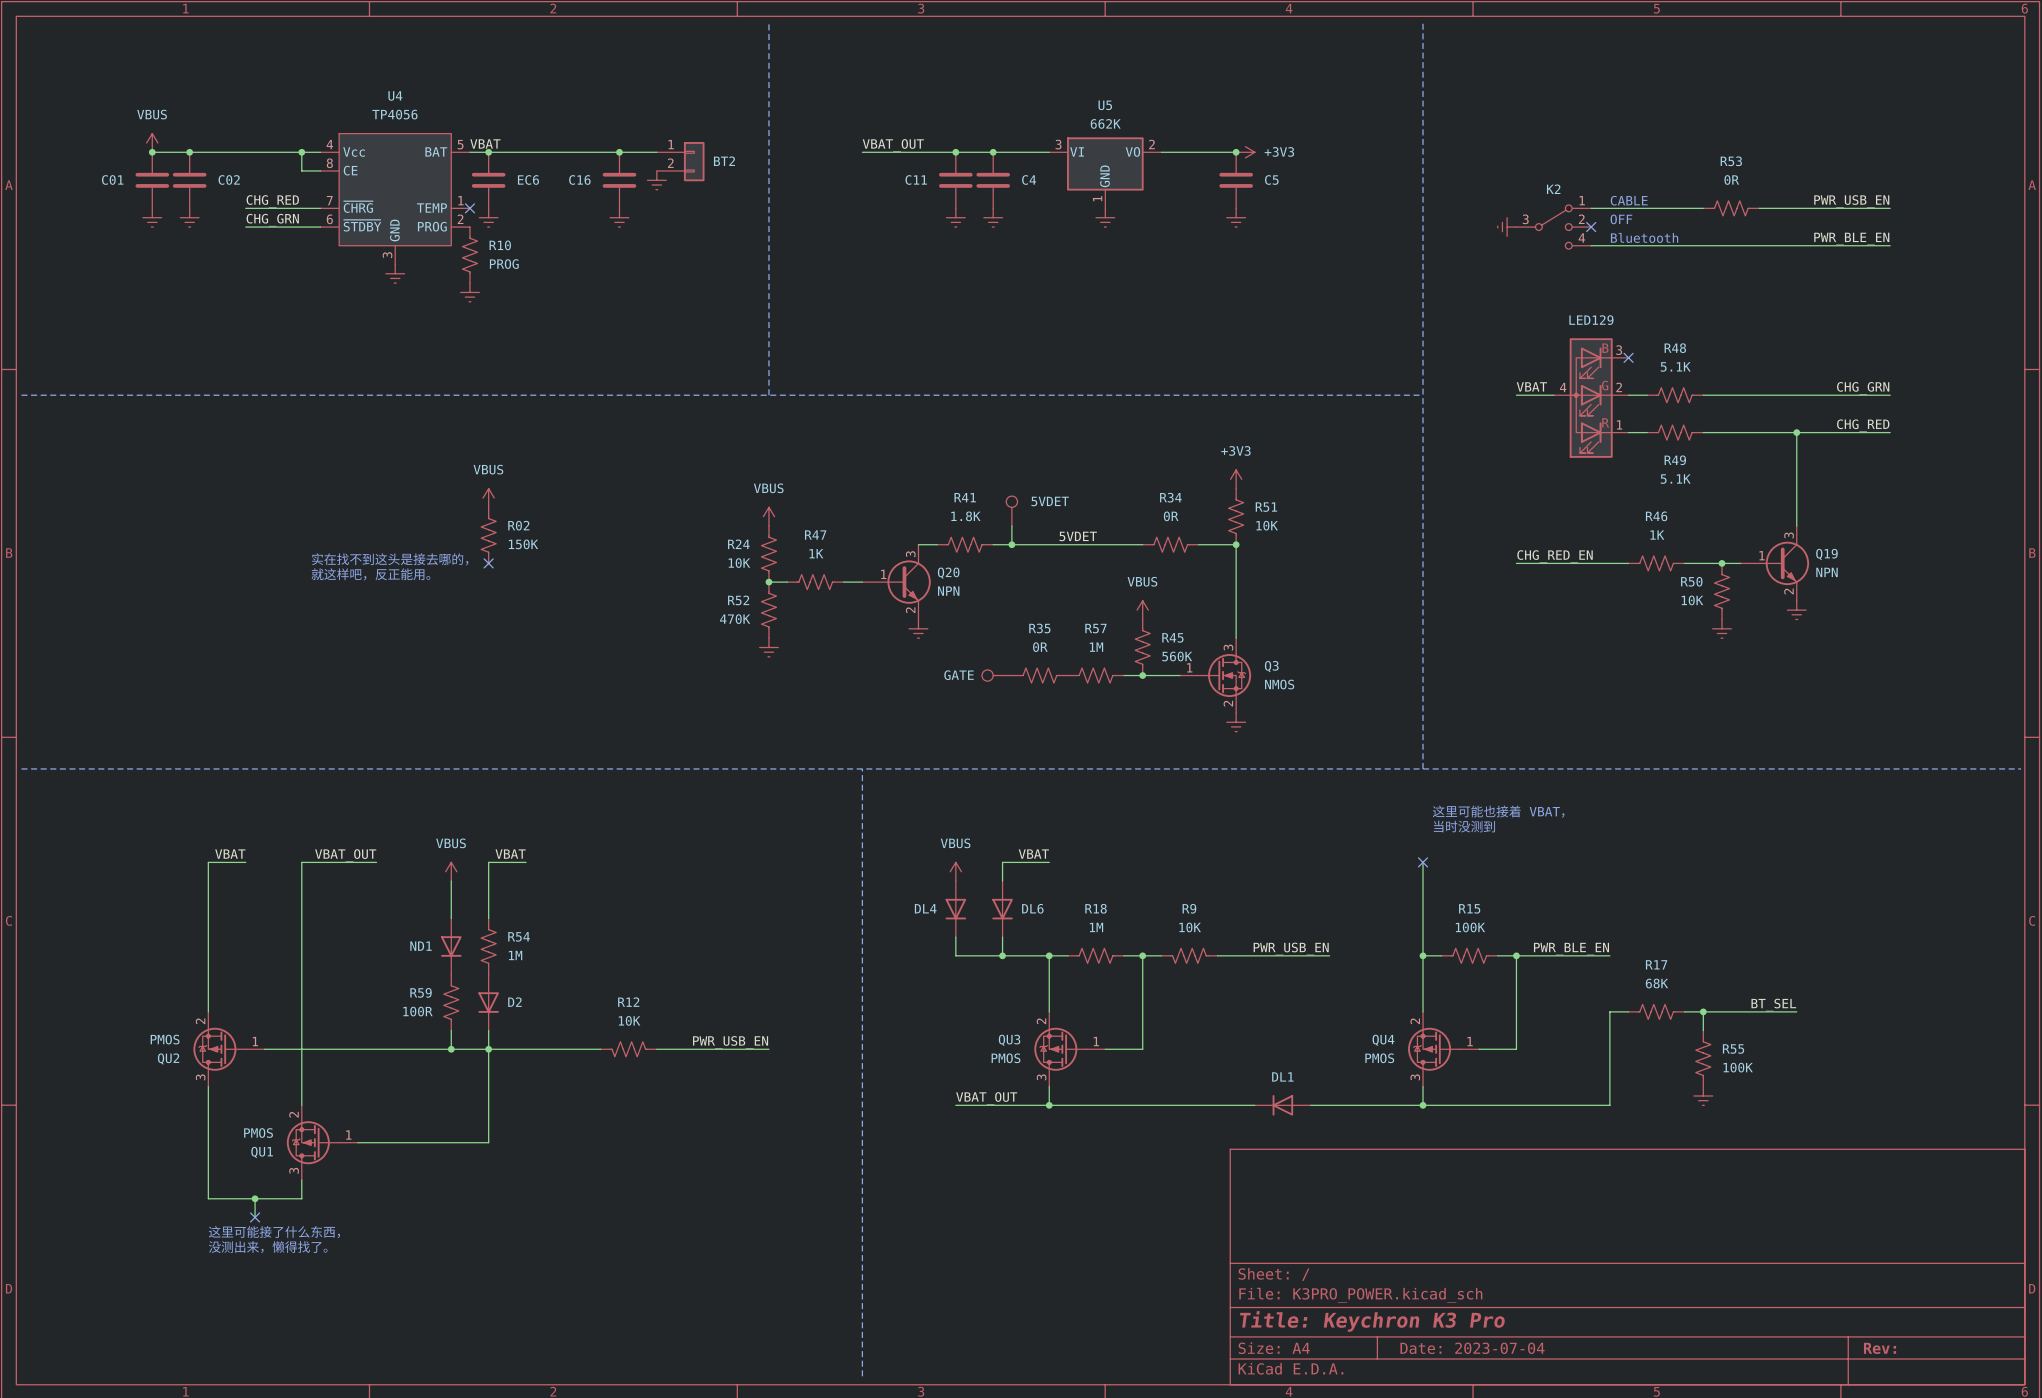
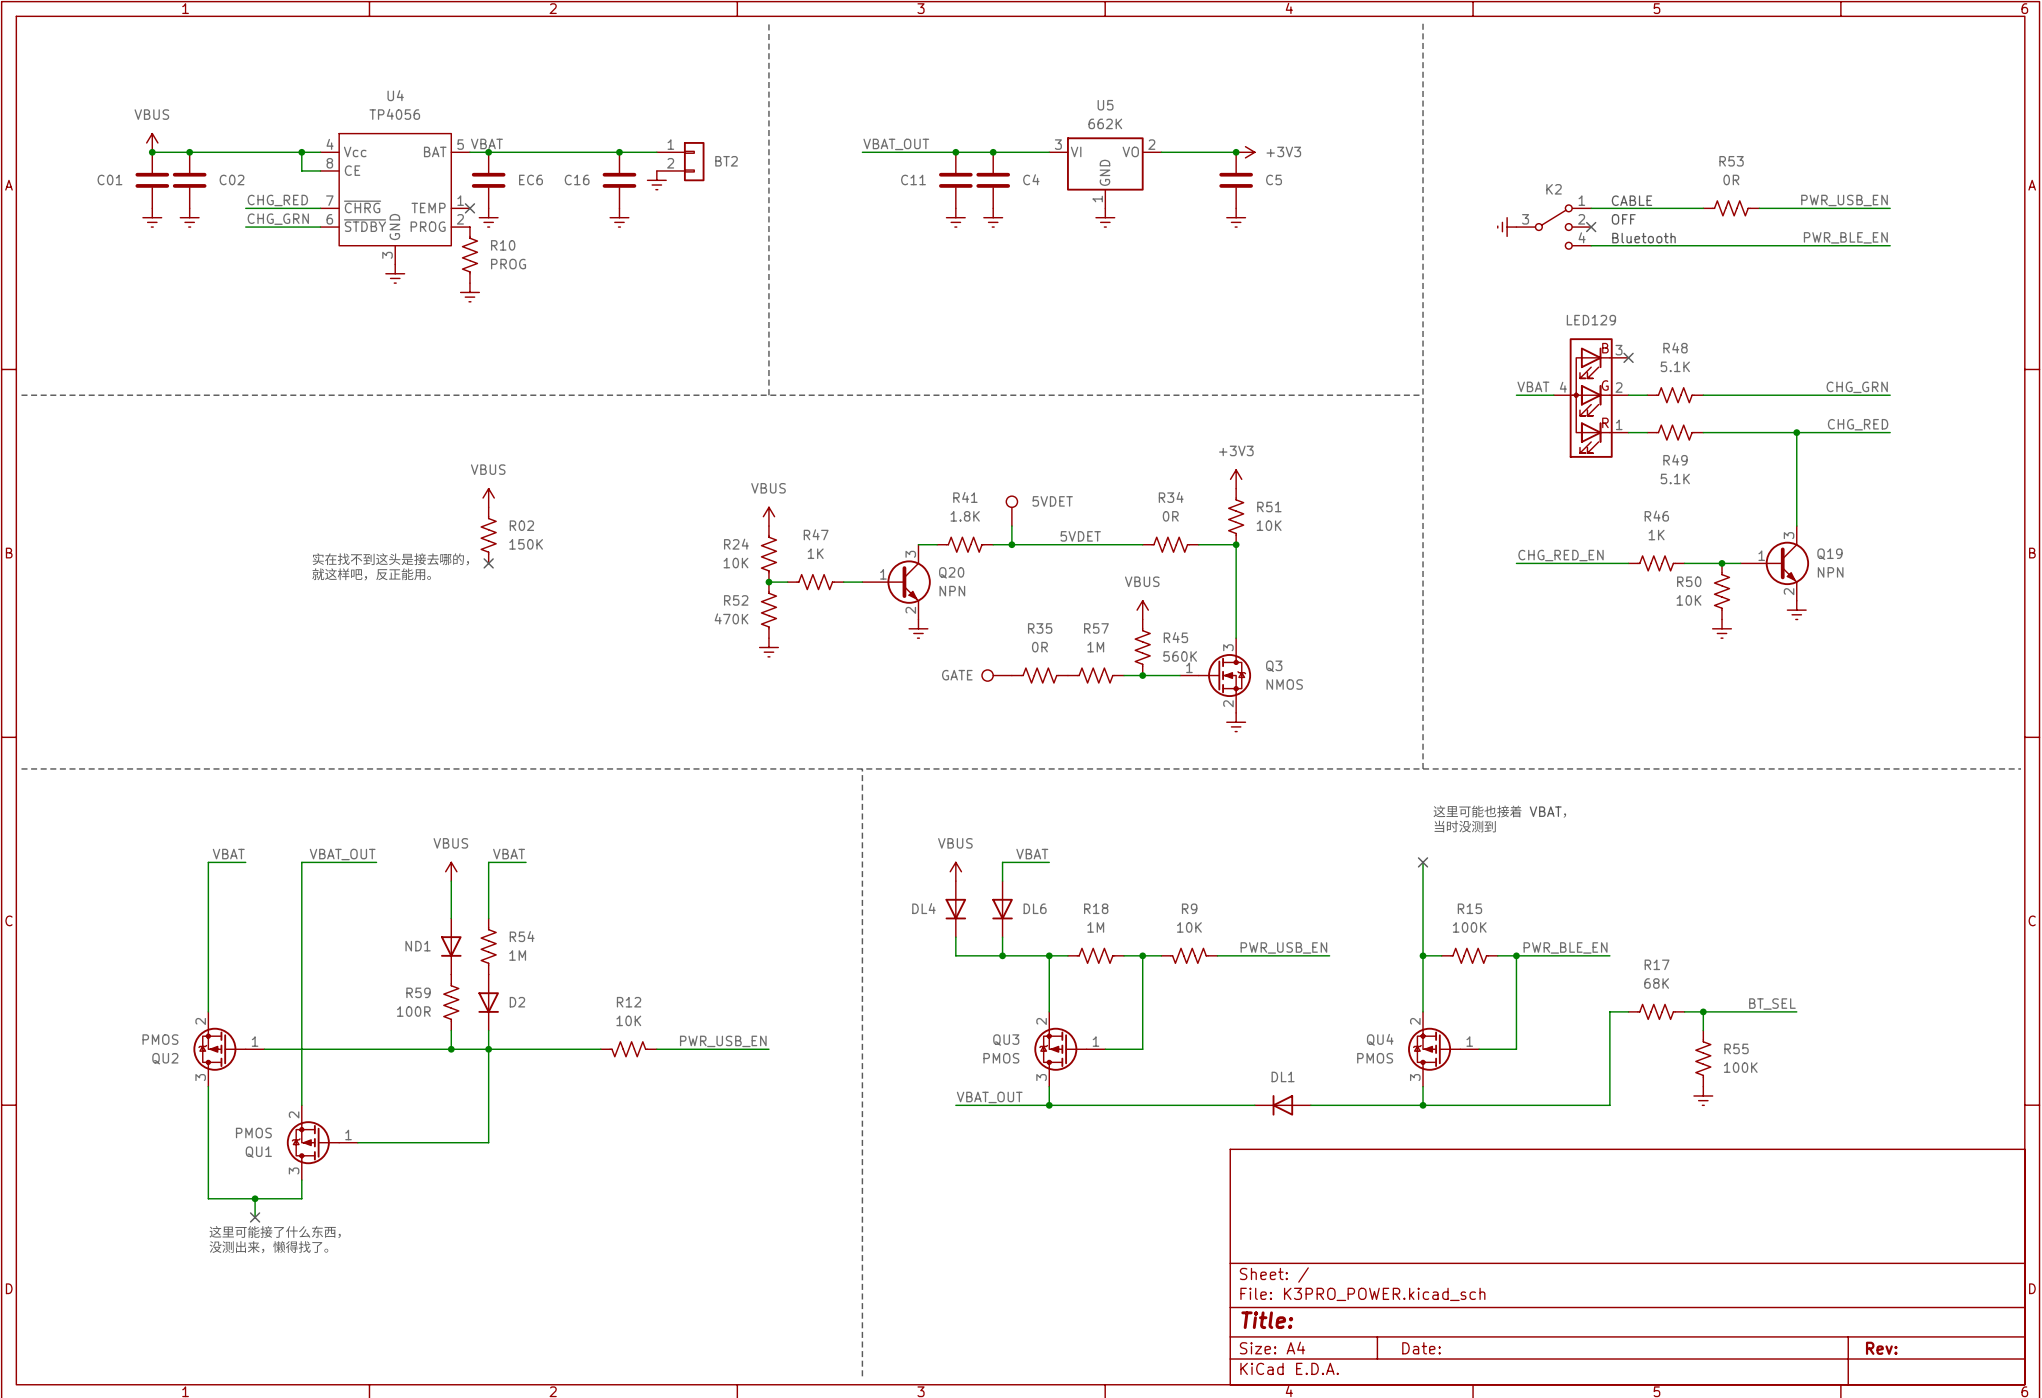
title block: Title: Keychron K3 Pro (1372, 1321) -> Title: (1267, 1320)
title block: Date: 2023-07-04 (1472, 1348) -> Date: (1421, 1348)

